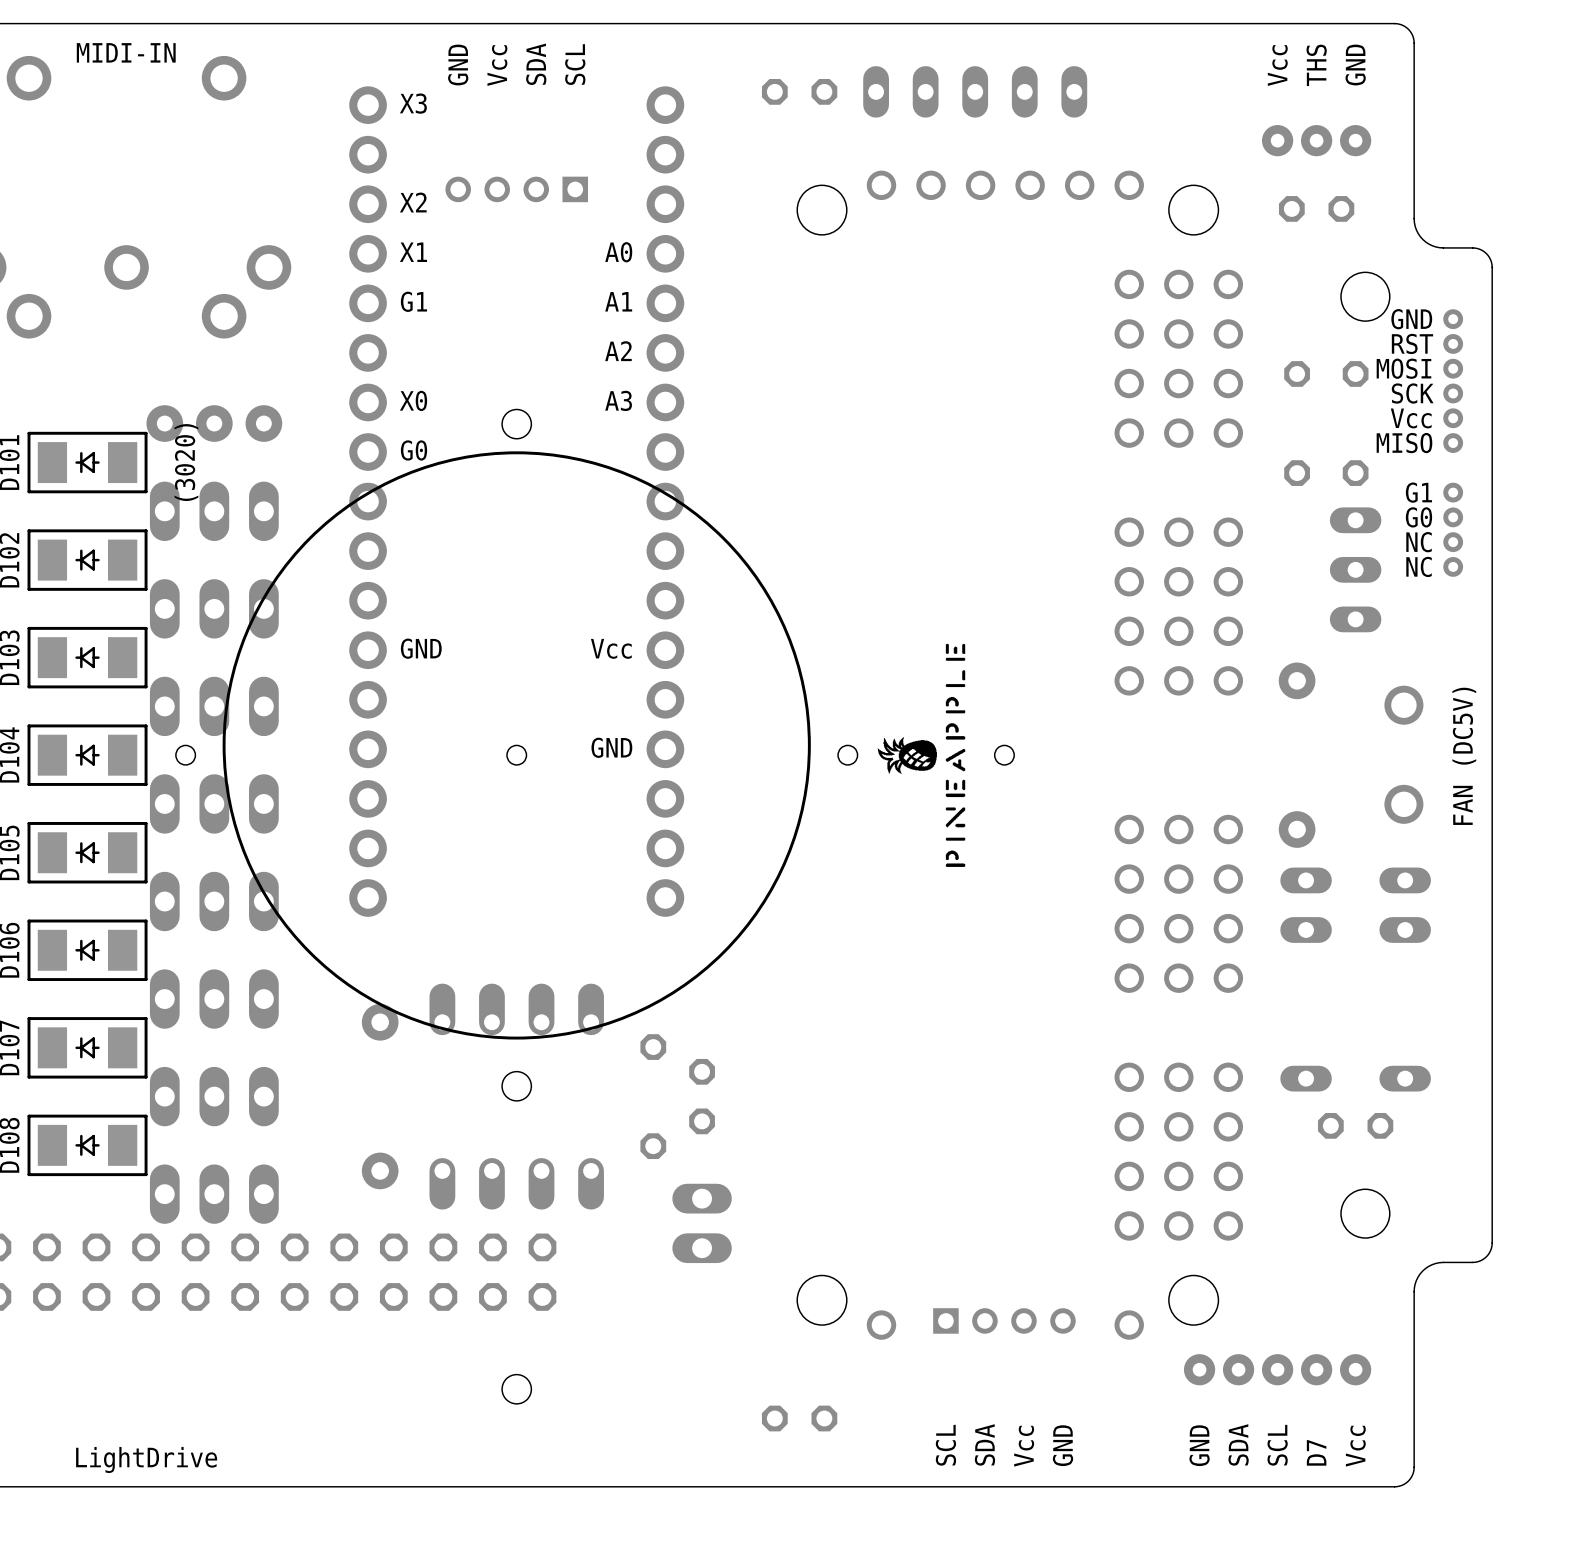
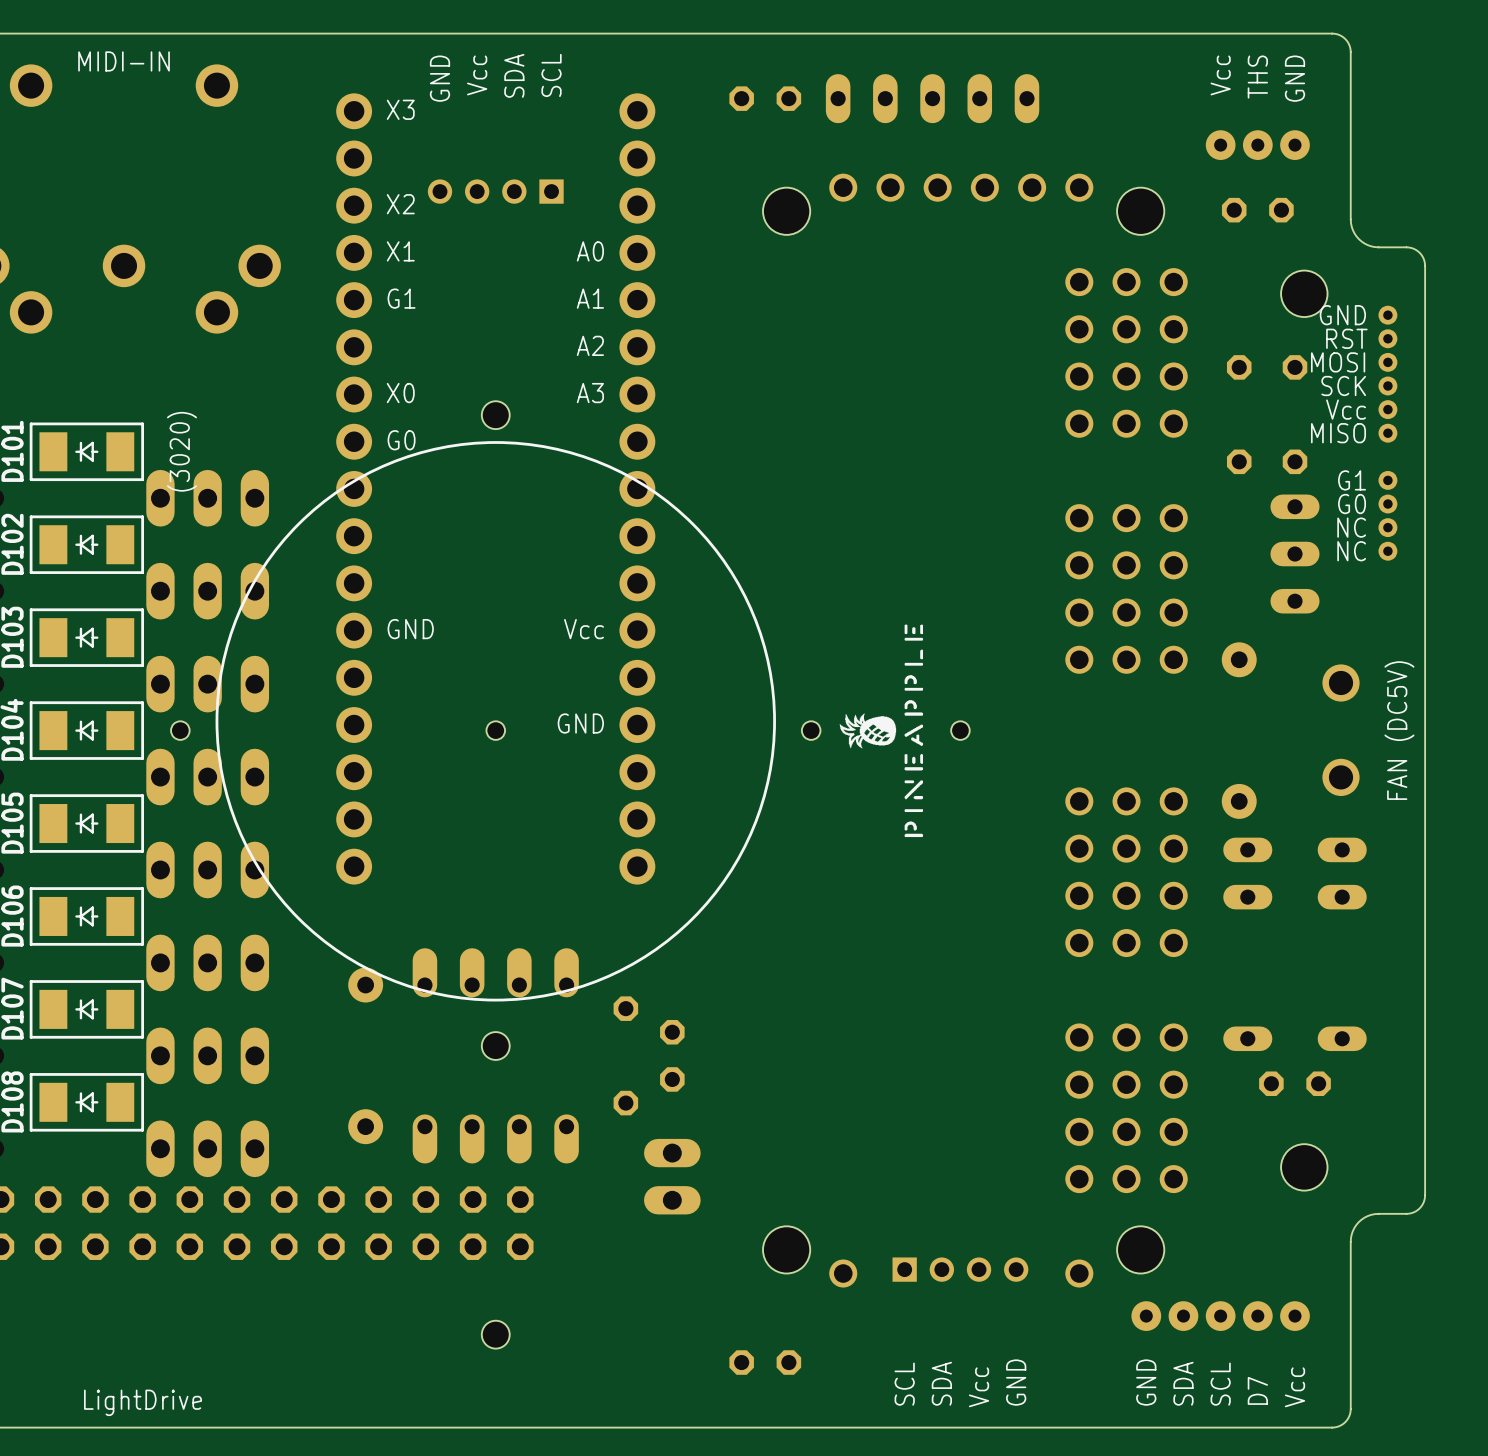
part: (214, 423) -> none

